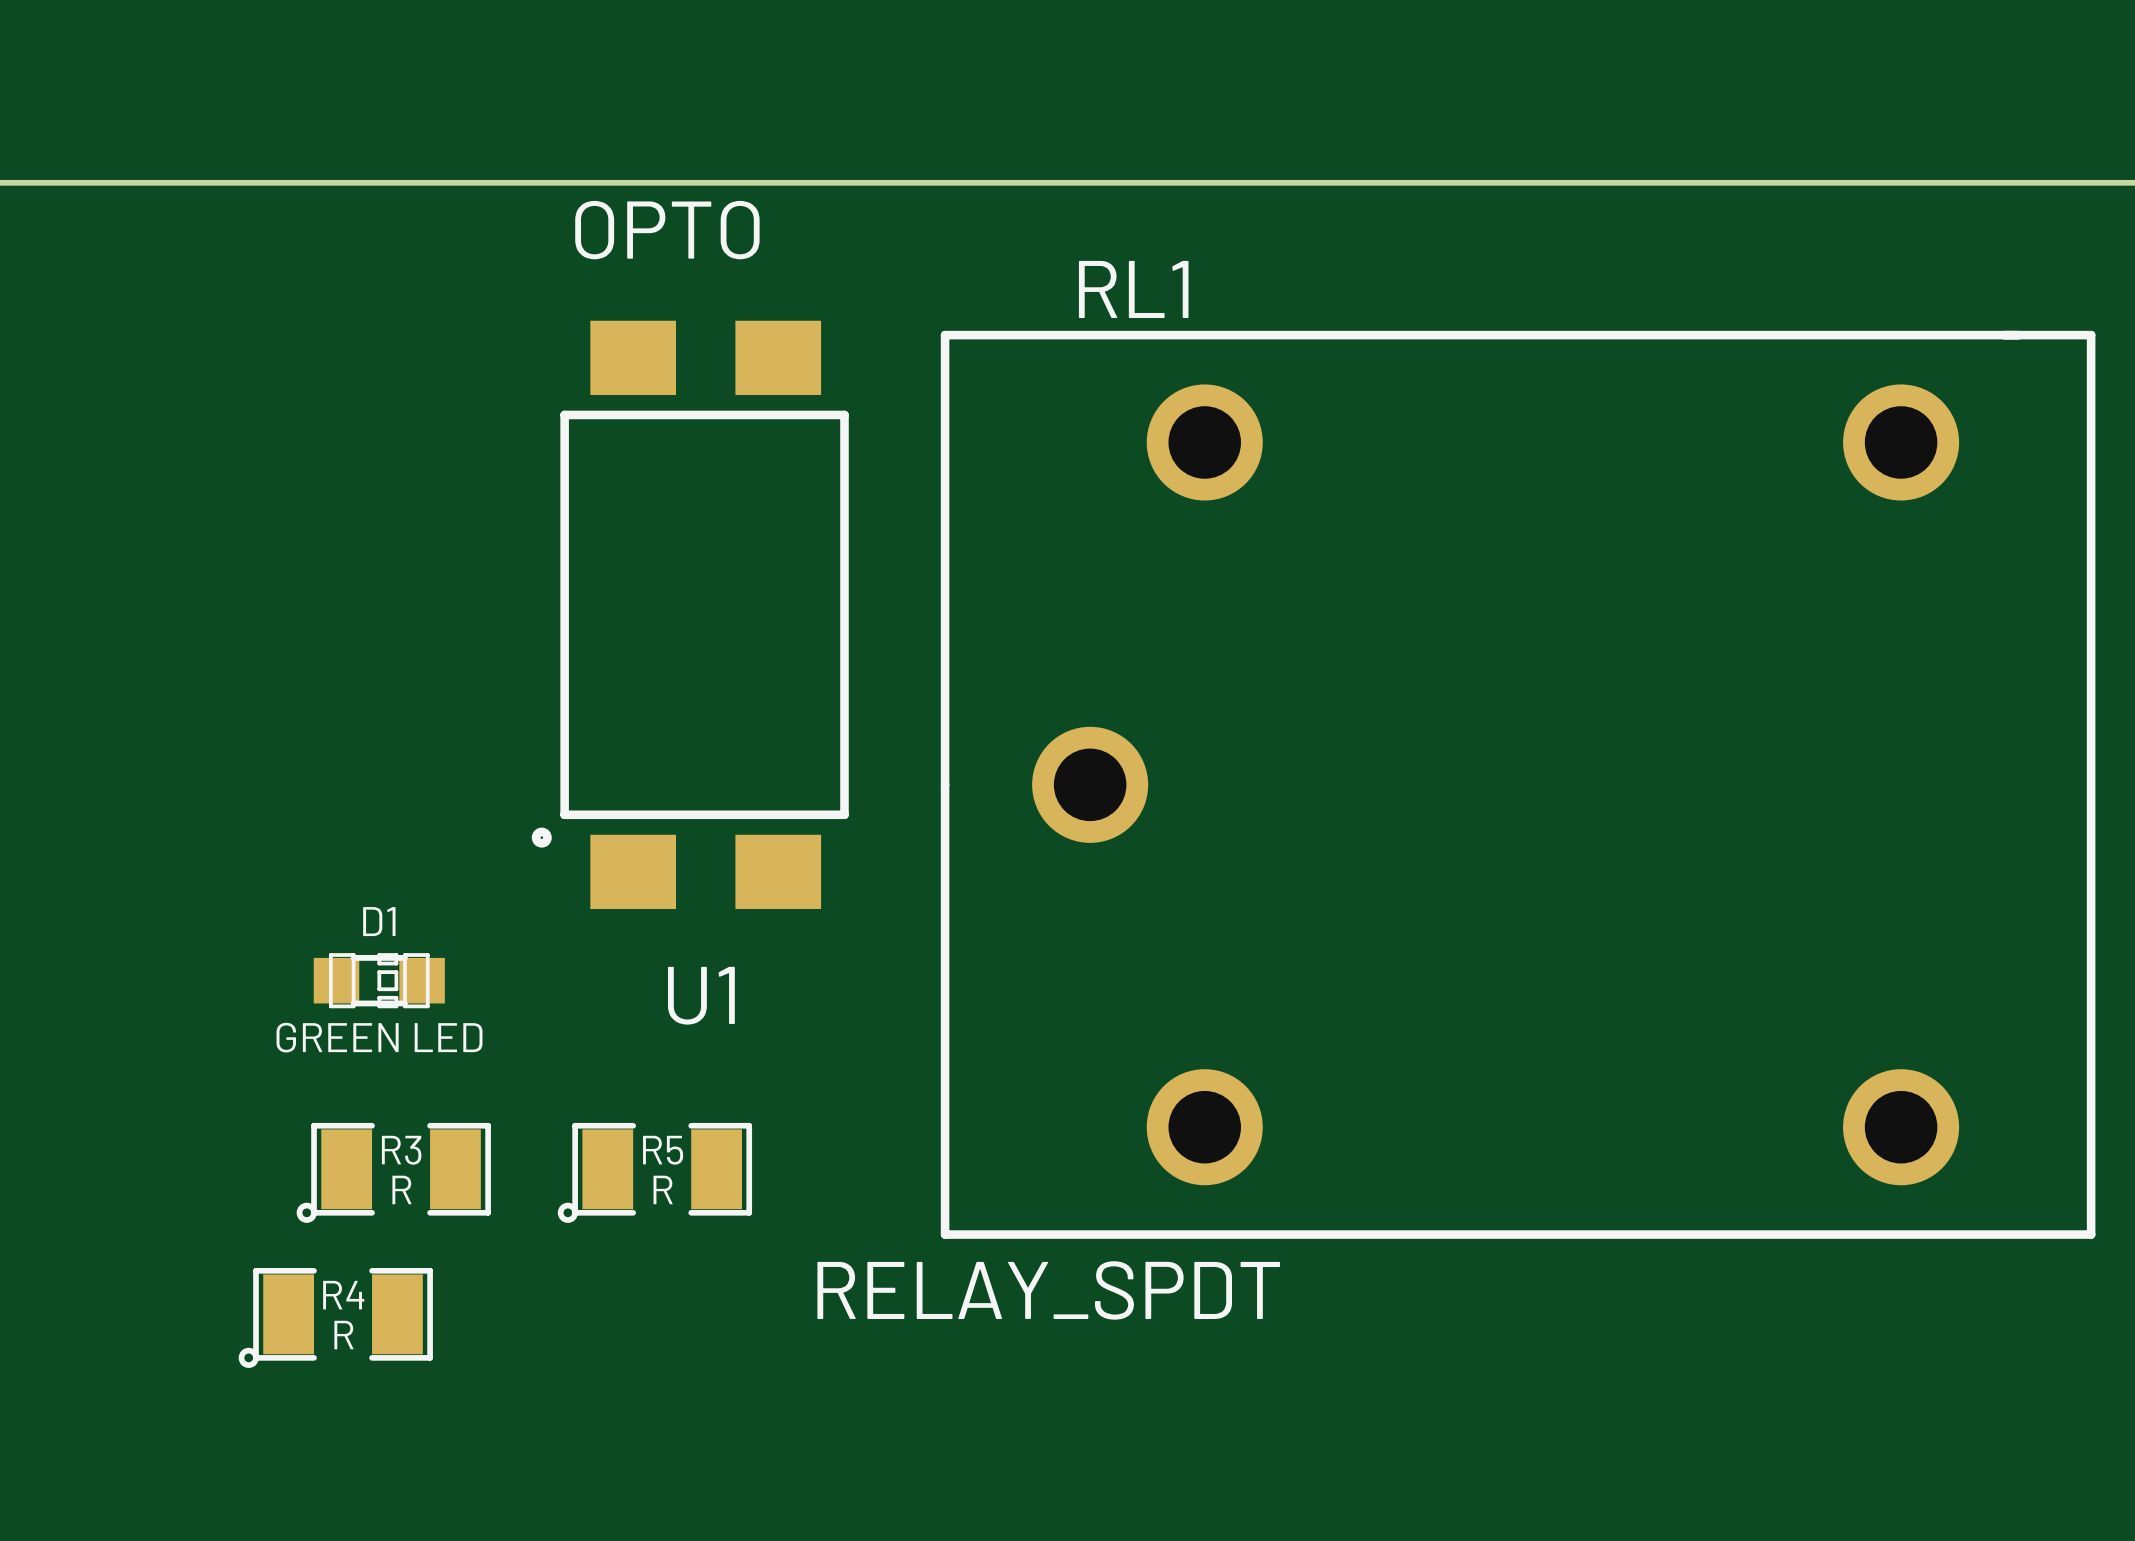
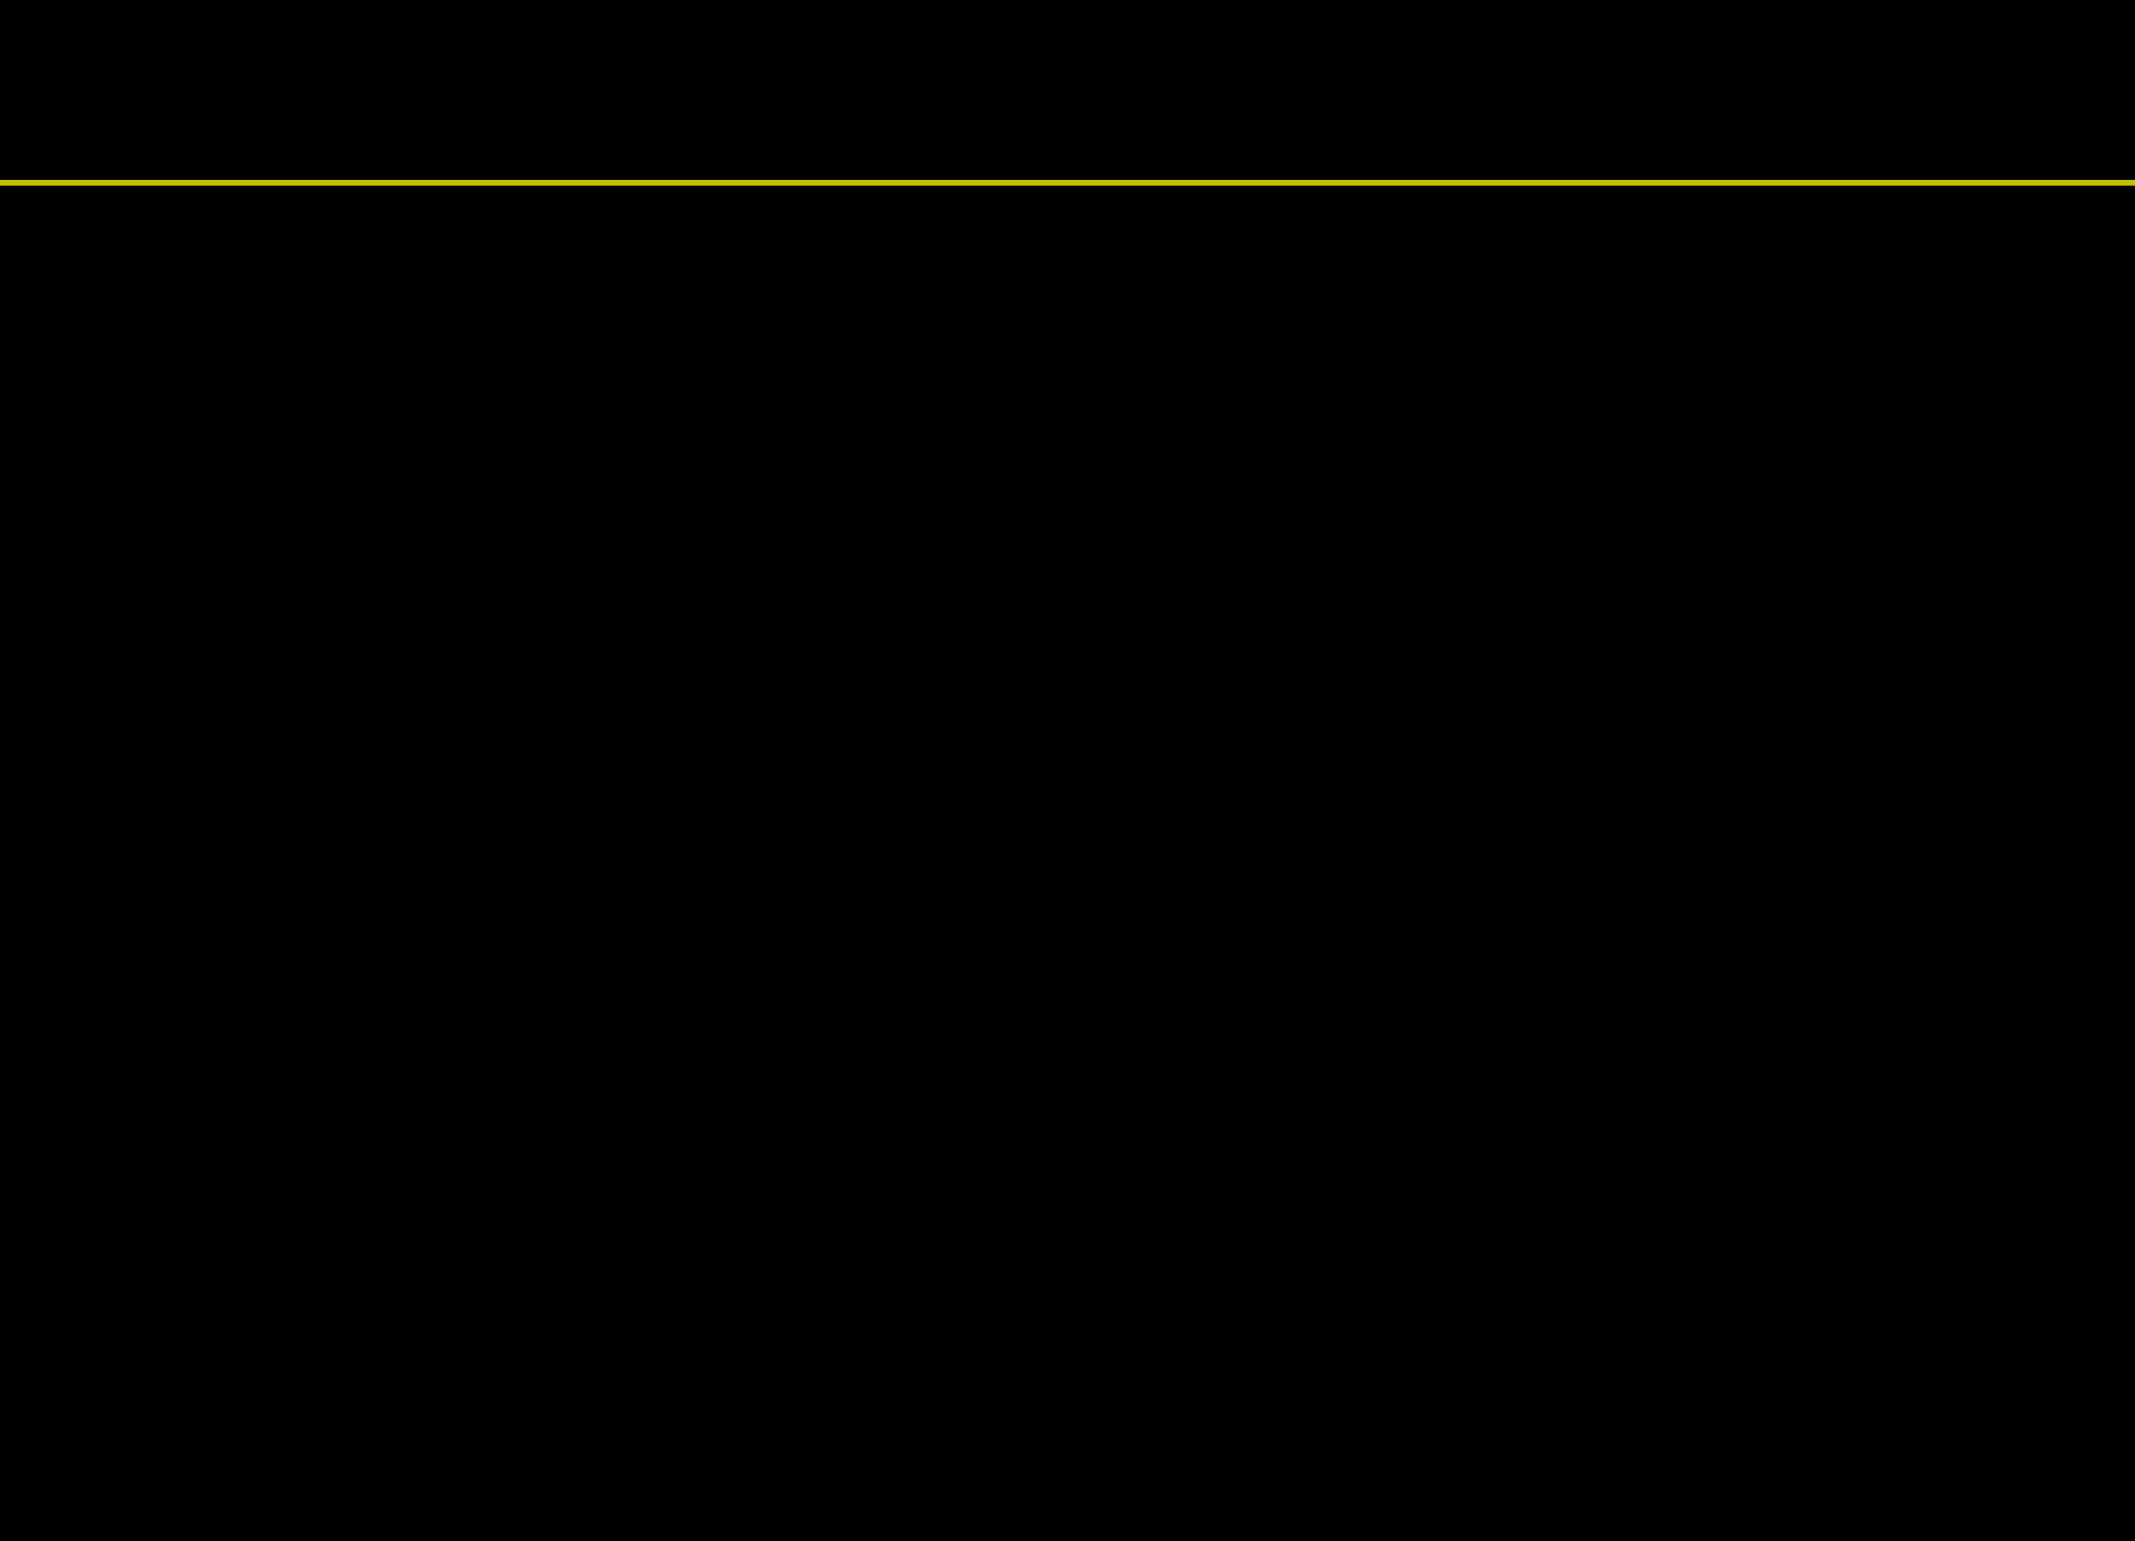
U1: OPTO (690, 614) -> none
RL1: RELAY_SPDT (1518, 784) -> none
D1: GREEN LED (379, 980) -> none
R3: R (393, 1172) -> none
R5: R (654, 1172) -> none
R4: R (335, 1317) -> none

